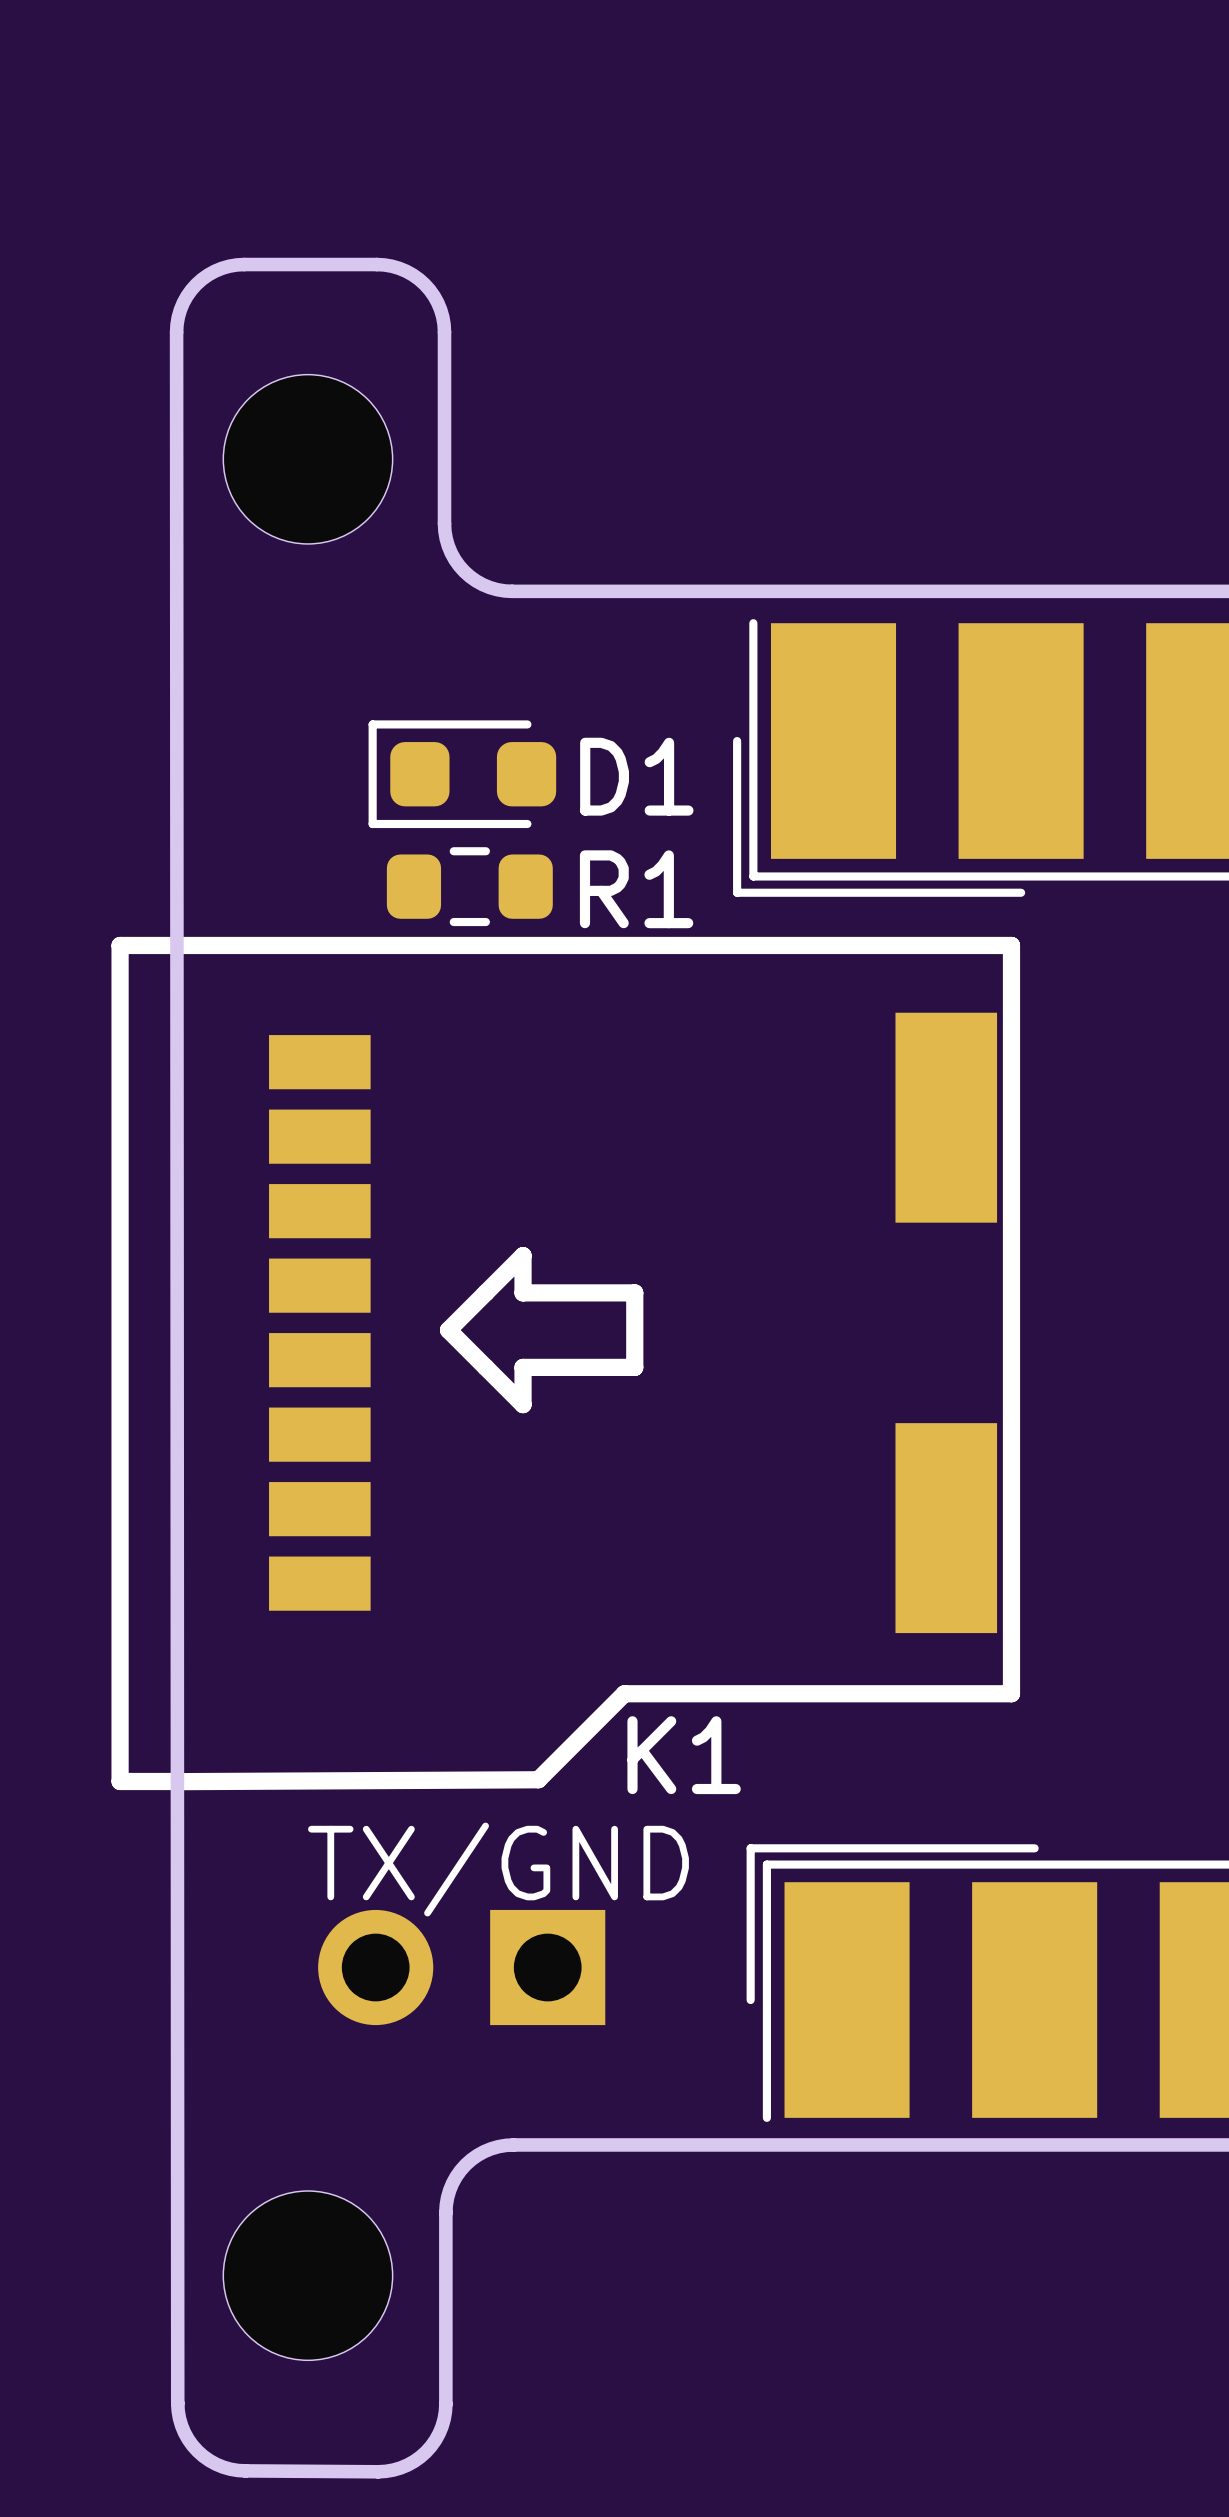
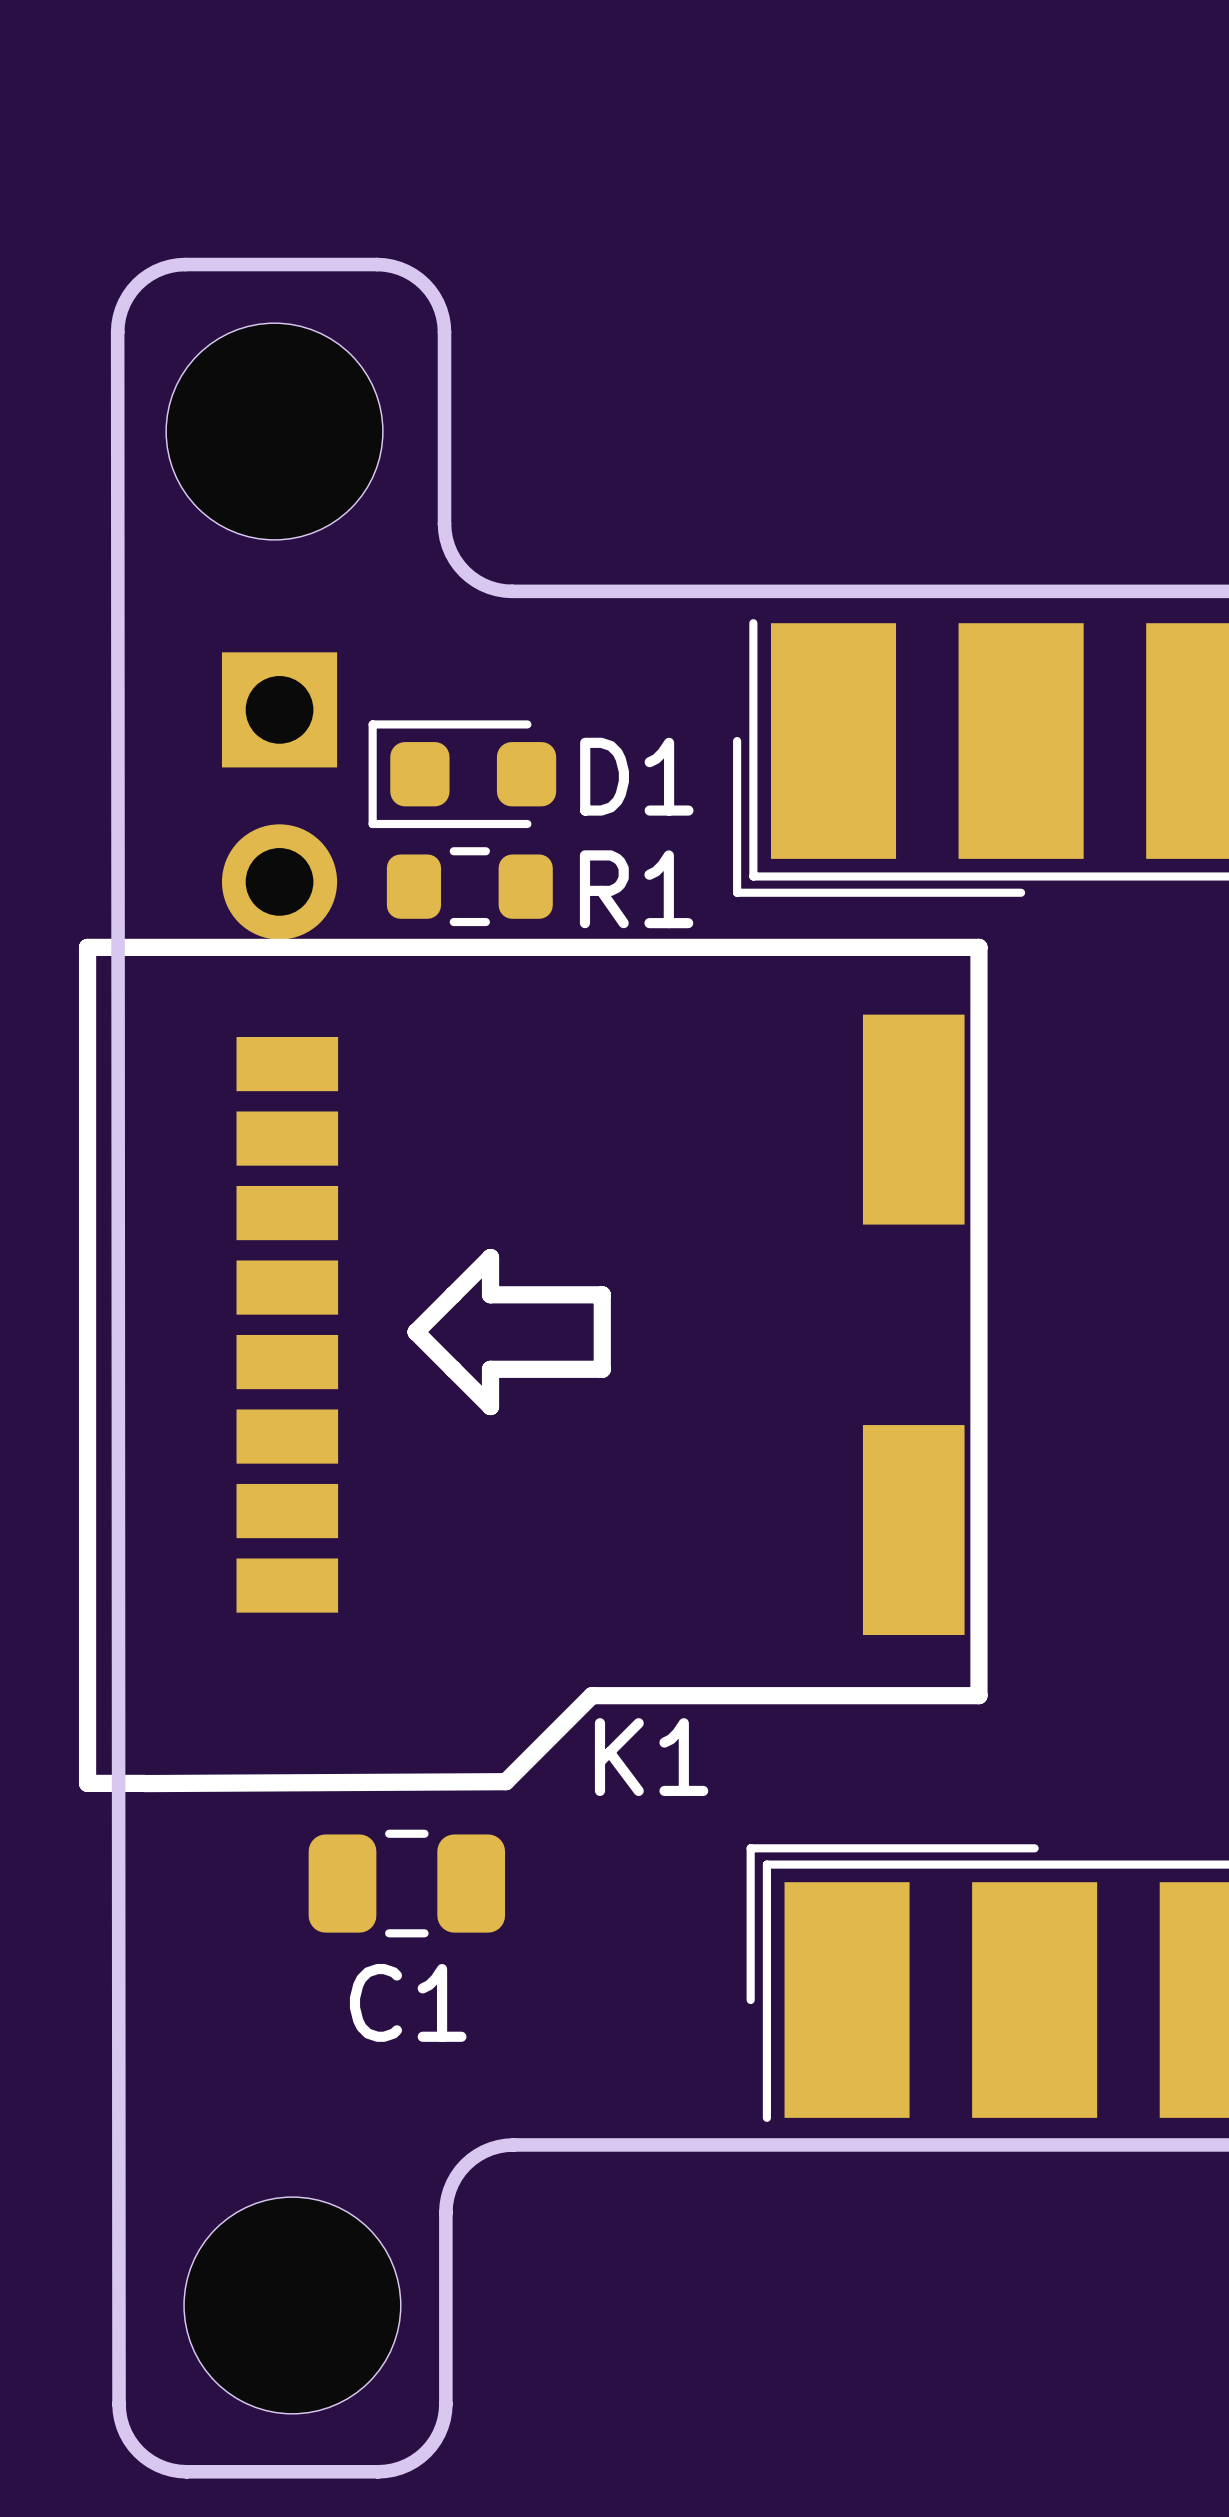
board edge: (244, 264) (221, 268) (208, 274) (196, 284) (183, 302) (178, 317) (176, 332) -> none
board edge: (176, 332) (178, 2410) (184, 2432) (192, 2445) (209, 2460) (223, 2467) (245, 2470) (378, 2471) -> (244, 264) (177, 264) (156, 271) (143, 279) (132, 290) (121, 309) (118, 324) (119, 2411) (125, 2433) (138, 2451) (157, 2465) (171, 2470) (186, 2471) (378, 2471)
part footprint: [223, 374, 393, 544] -> [166, 323, 383, 540]
K1 position: (565, 1363) -> (533, 1365)
text: TX/GND (498, 1869) -> none
C1: none -> (406, 1883)
part rotation: 0° (461, 1967) -> 90° counterclockwise (279, 795)
part position: (461, 1967) -> (279, 795)
part footprint: [223, 2191, 393, 2361] -> [184, 2197, 401, 2414]

